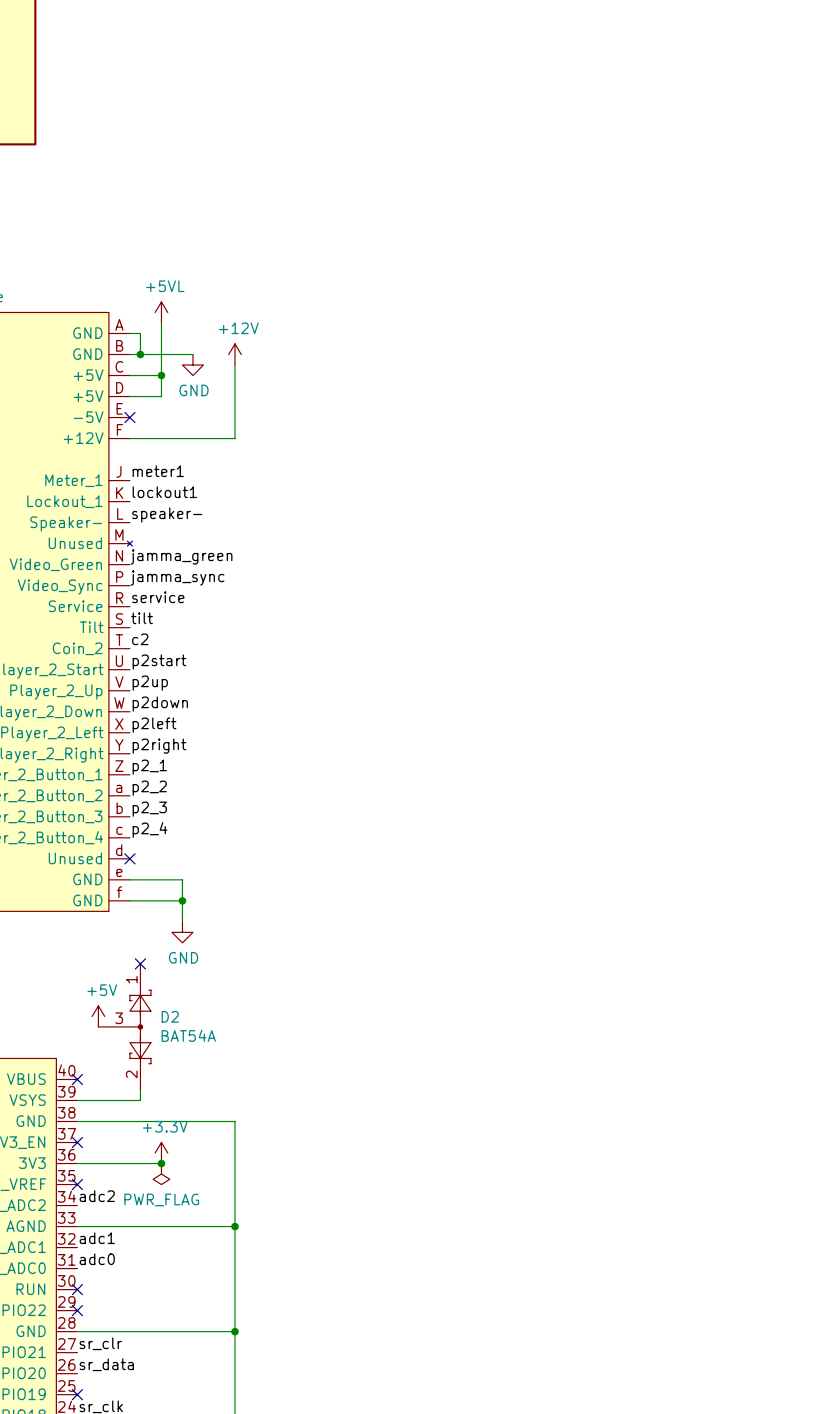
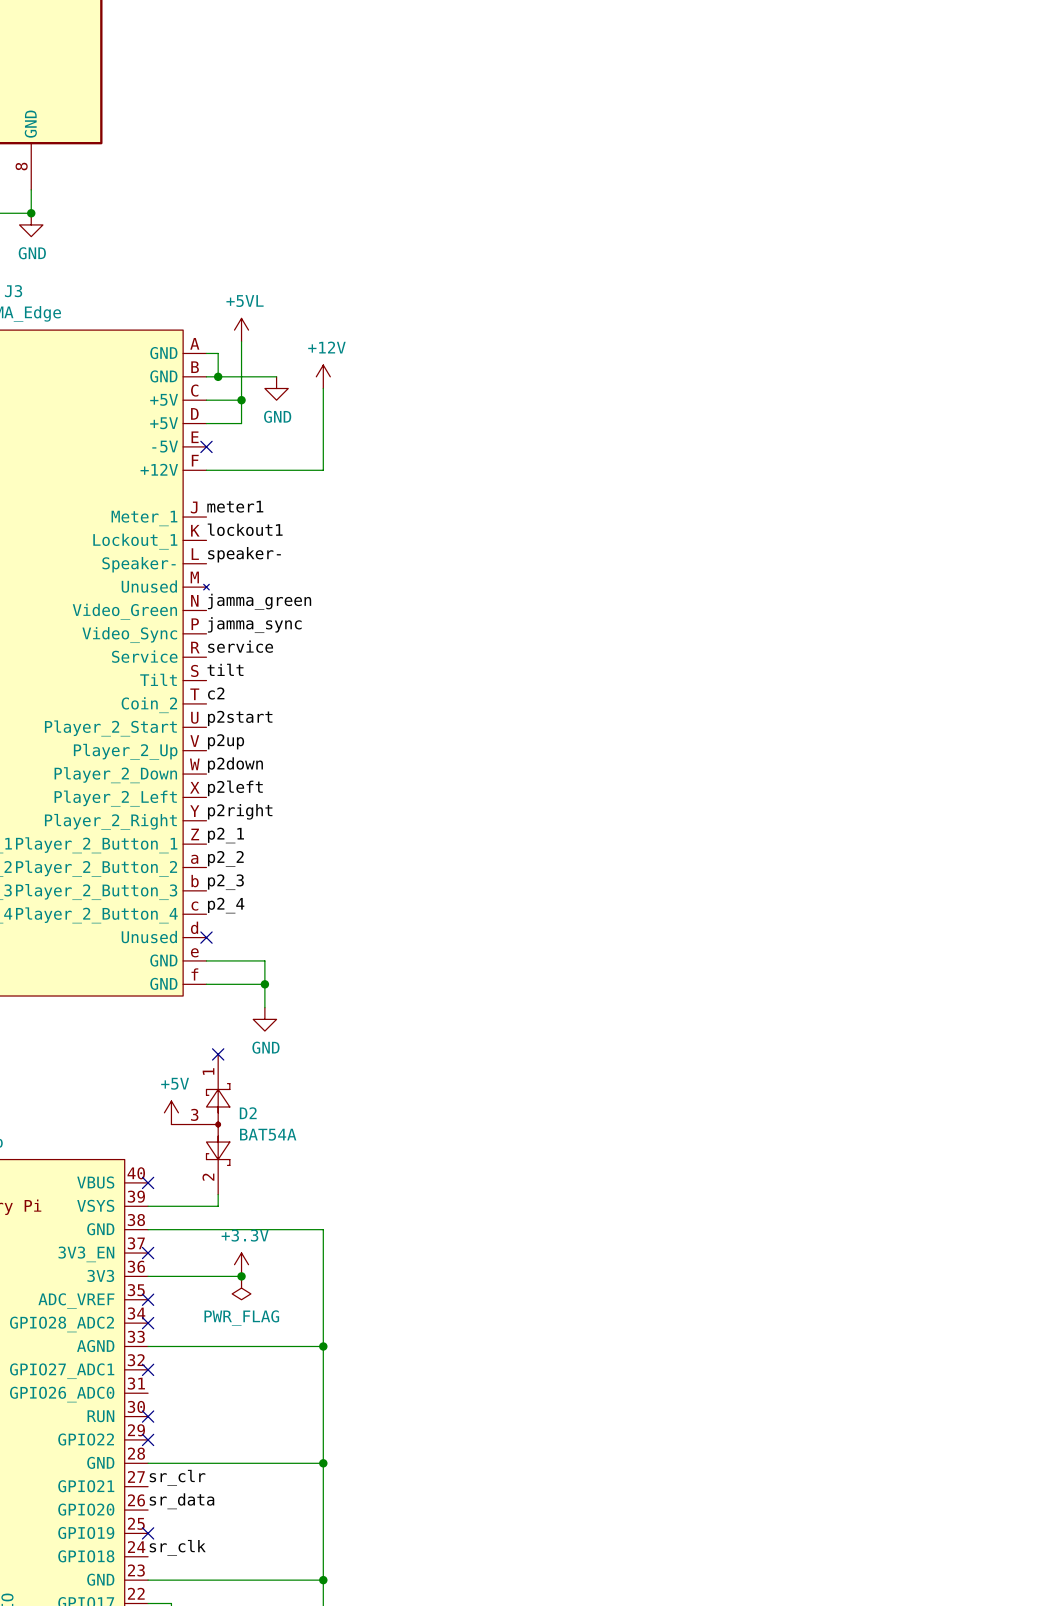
label: adc2 (97, 1196) -> none
no-connect mark: none -> (148, 1323)
label: adc1 (97, 1238) -> none
no-connect mark: none -> (148, 1369)
label: adc0 (97, 1259) -> none

